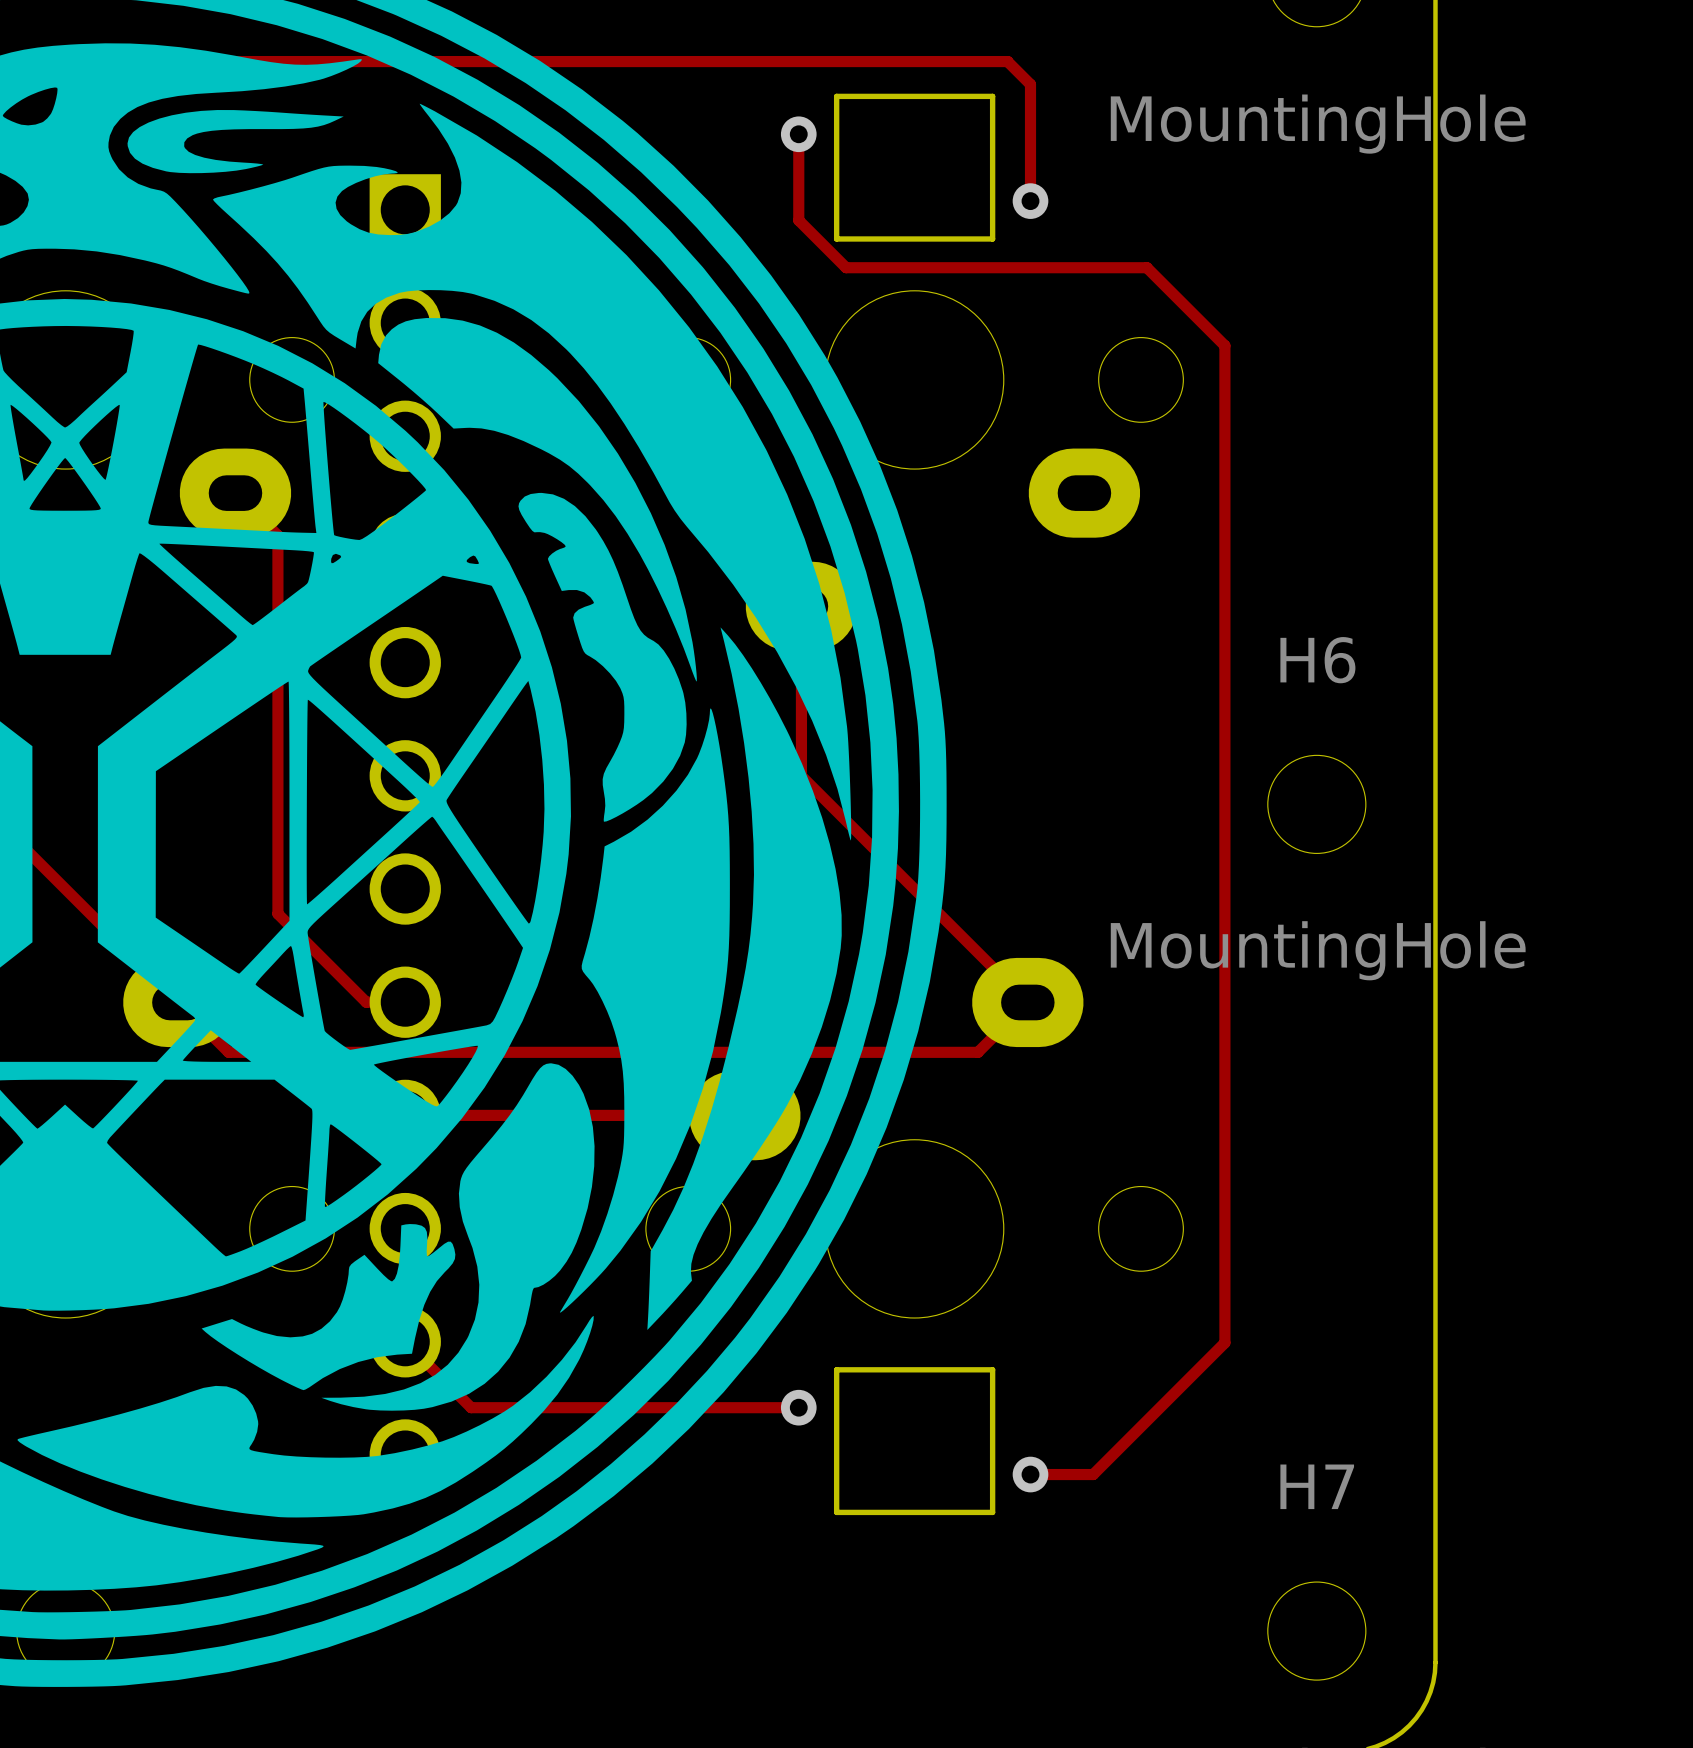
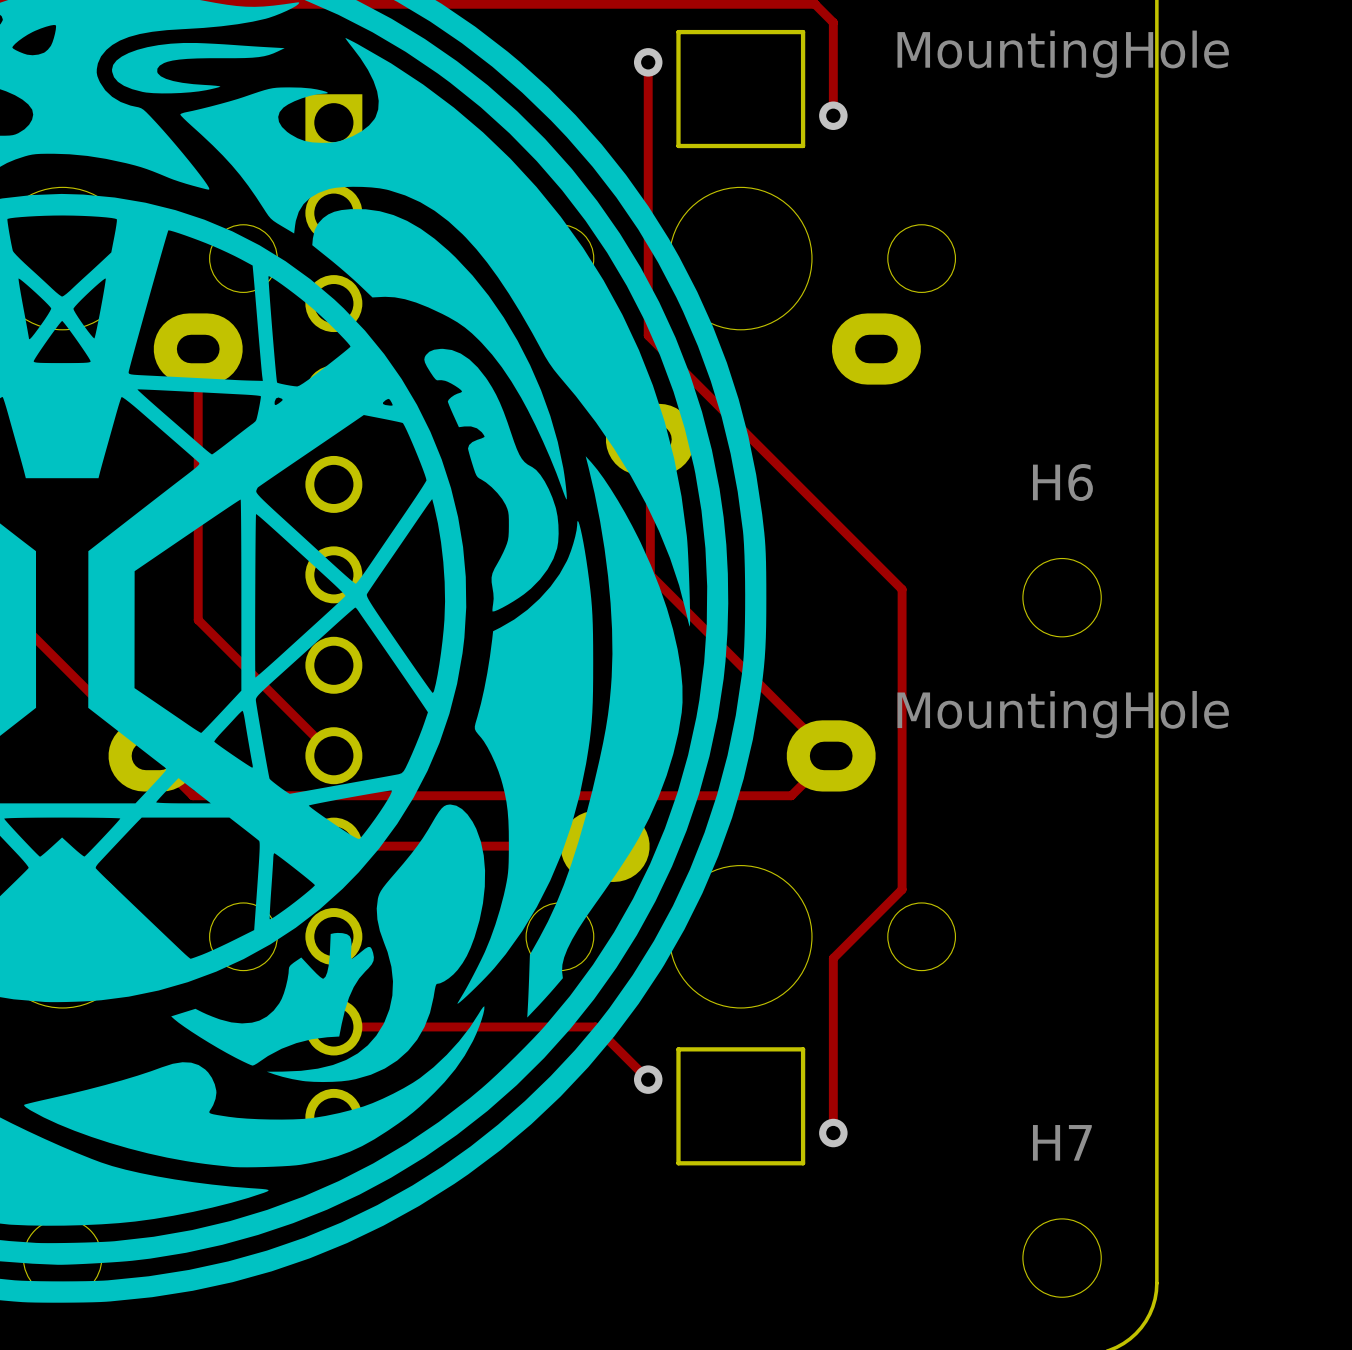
track: (798, 220) (846, 267) (1146, 267) (1224, 345) (1224, 1342) (1093, 1474) (1030, 1474) -> (648, 131) (648, 335) (902, 589) (902, 889) (833, 958) (833, 1133)
track: (235, 493) (277, 535) (277, 913) (366, 1002) (405, 1002) -> (198, 349) (198, 620) (333, 755)
track: (405, 1341) (471, 1407) (798, 1407) -> (333, 1026) (595, 1026) (648, 1079)

